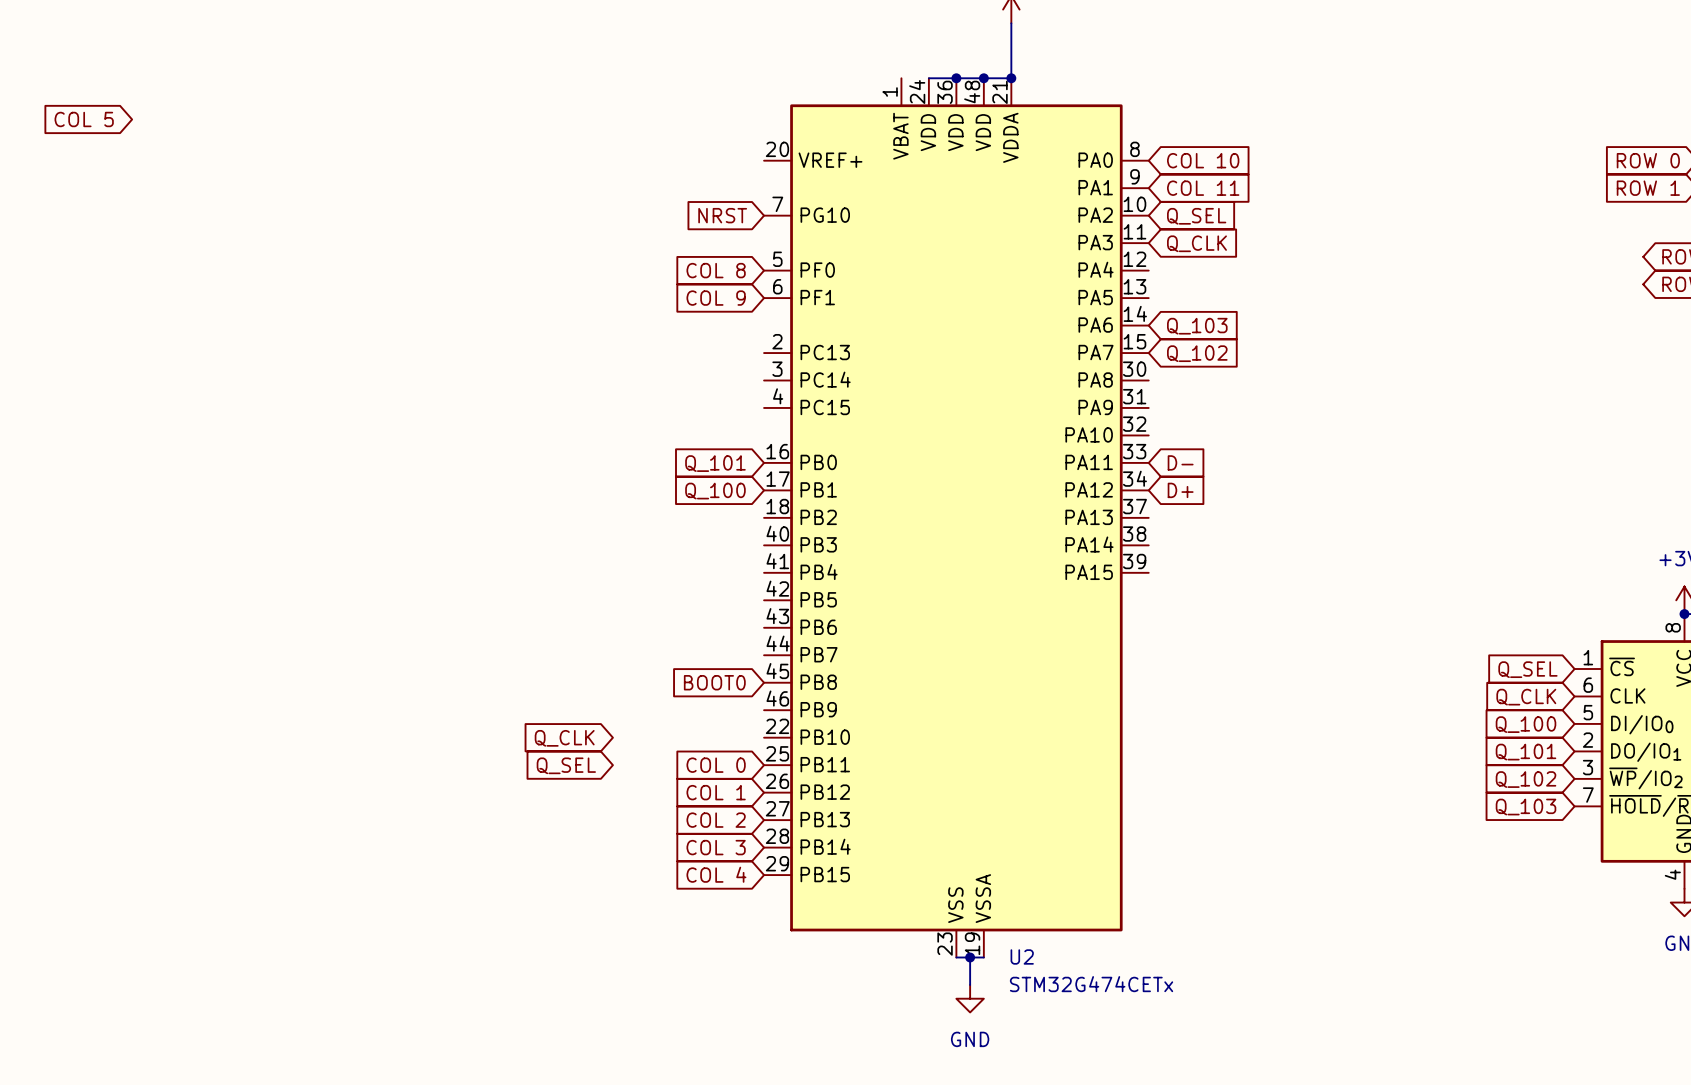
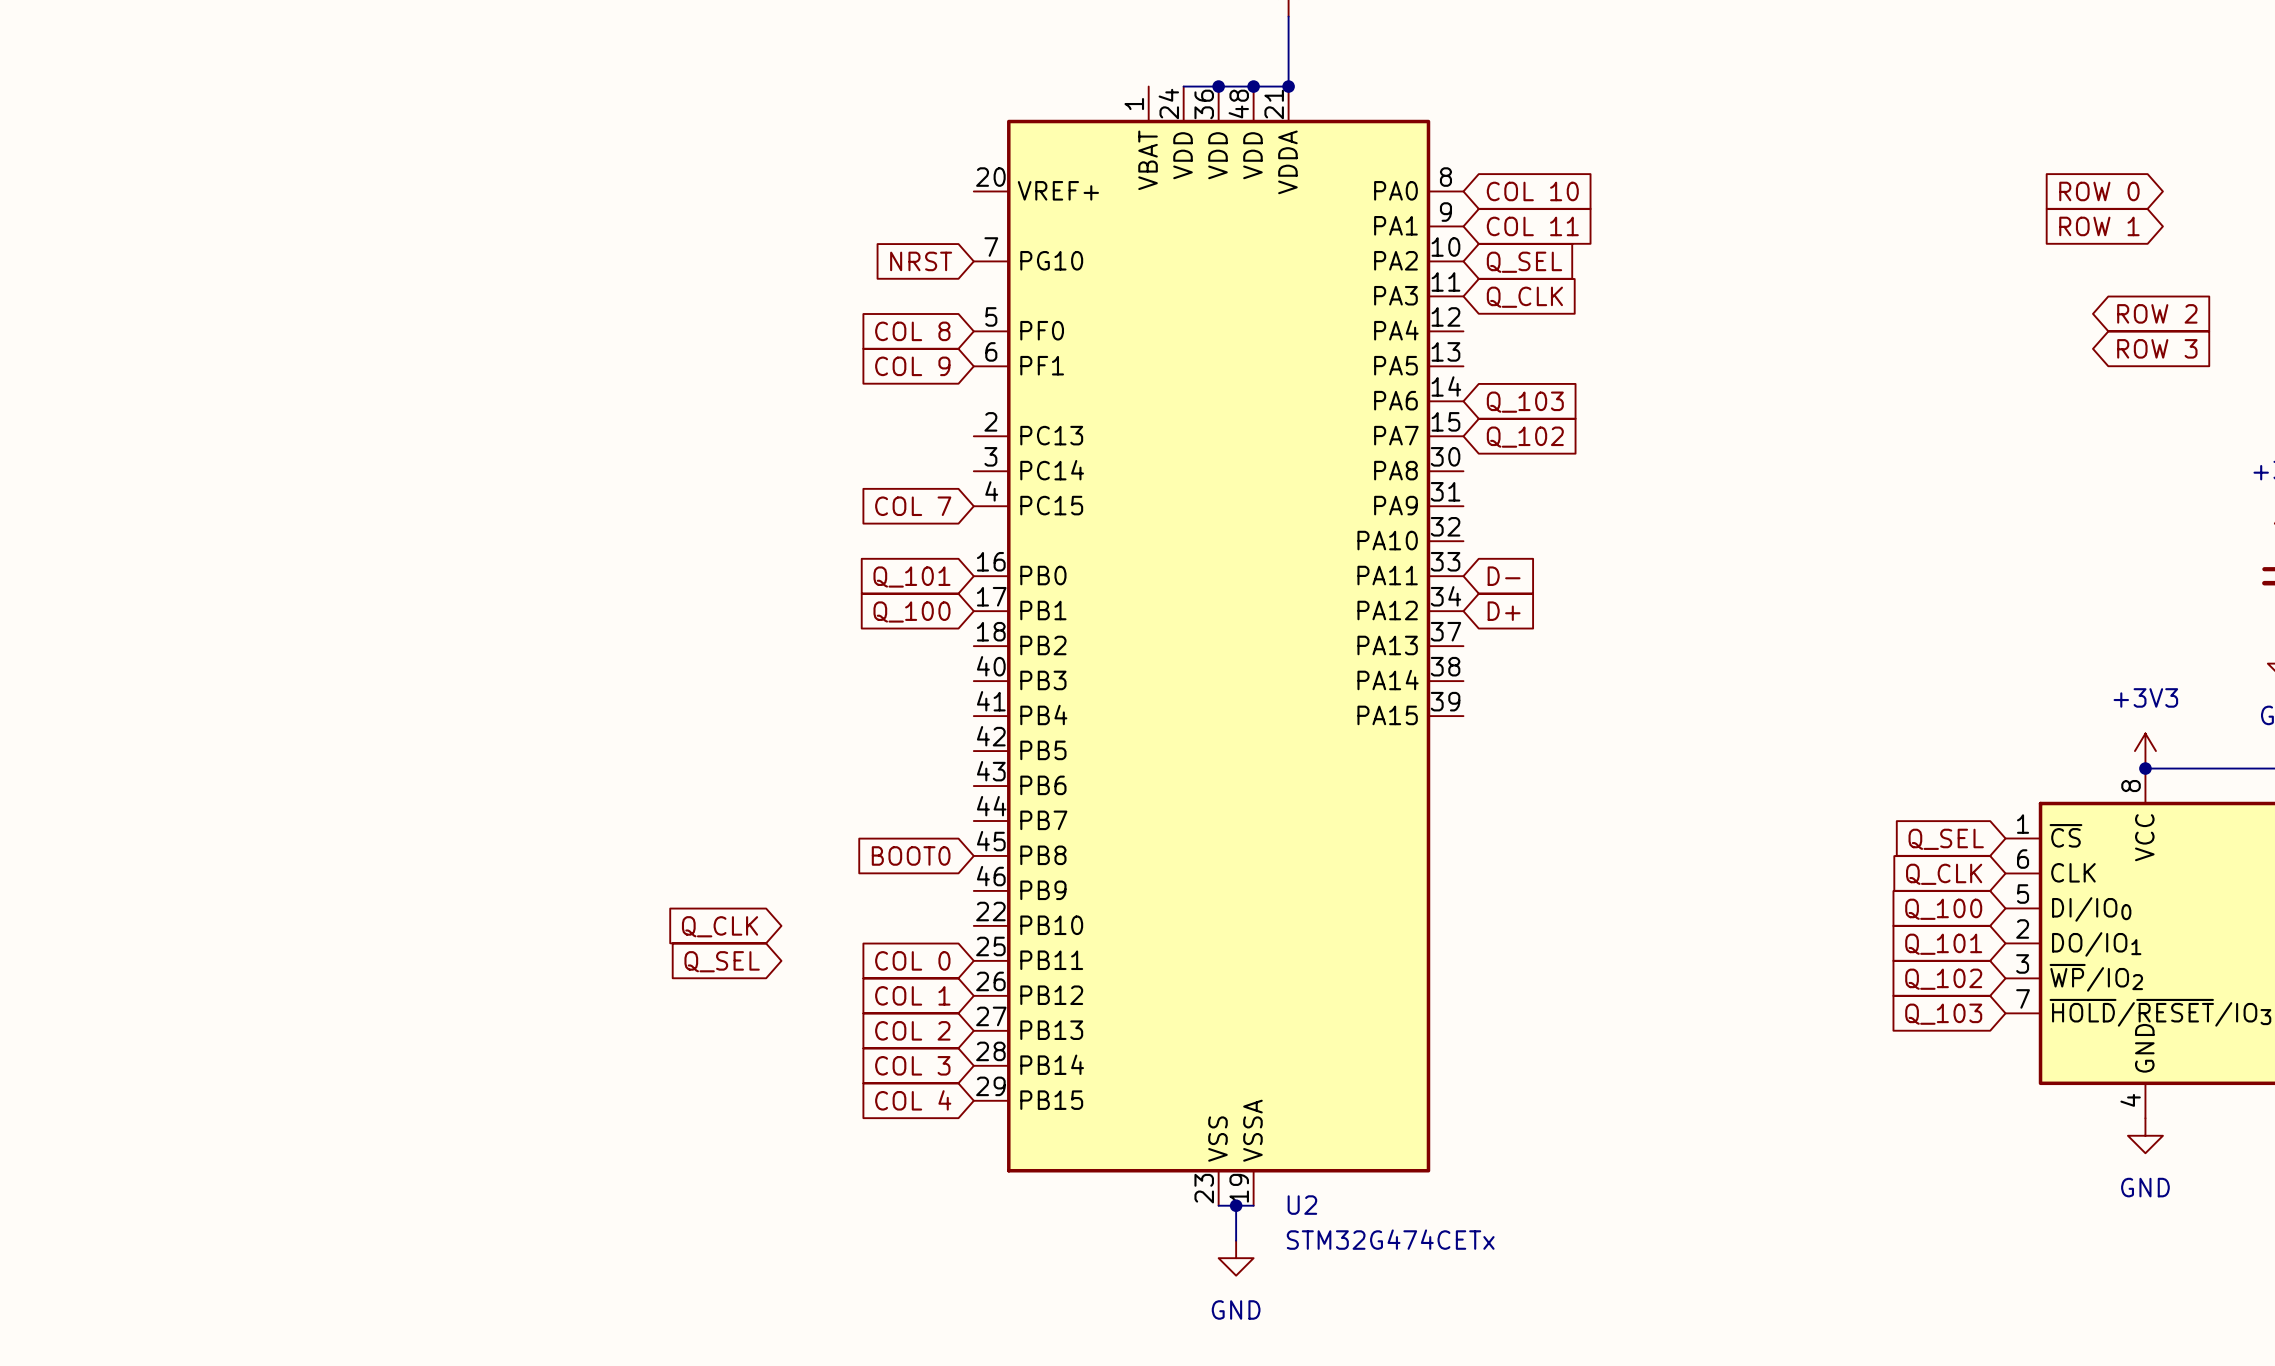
global label: COL 5 (84, 119) -> none
global label: none -> COL 7 (913, 506)

